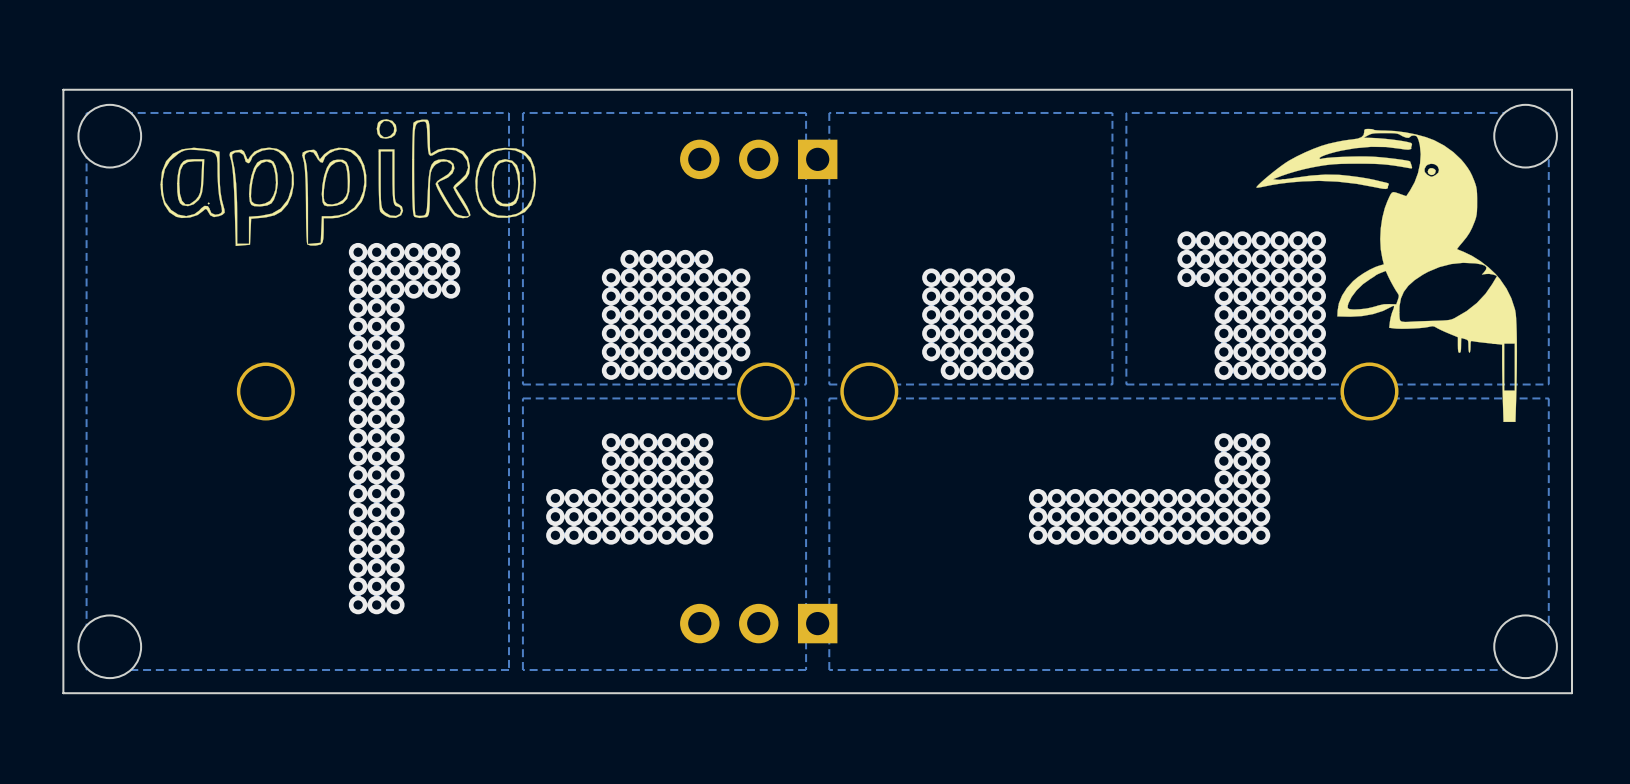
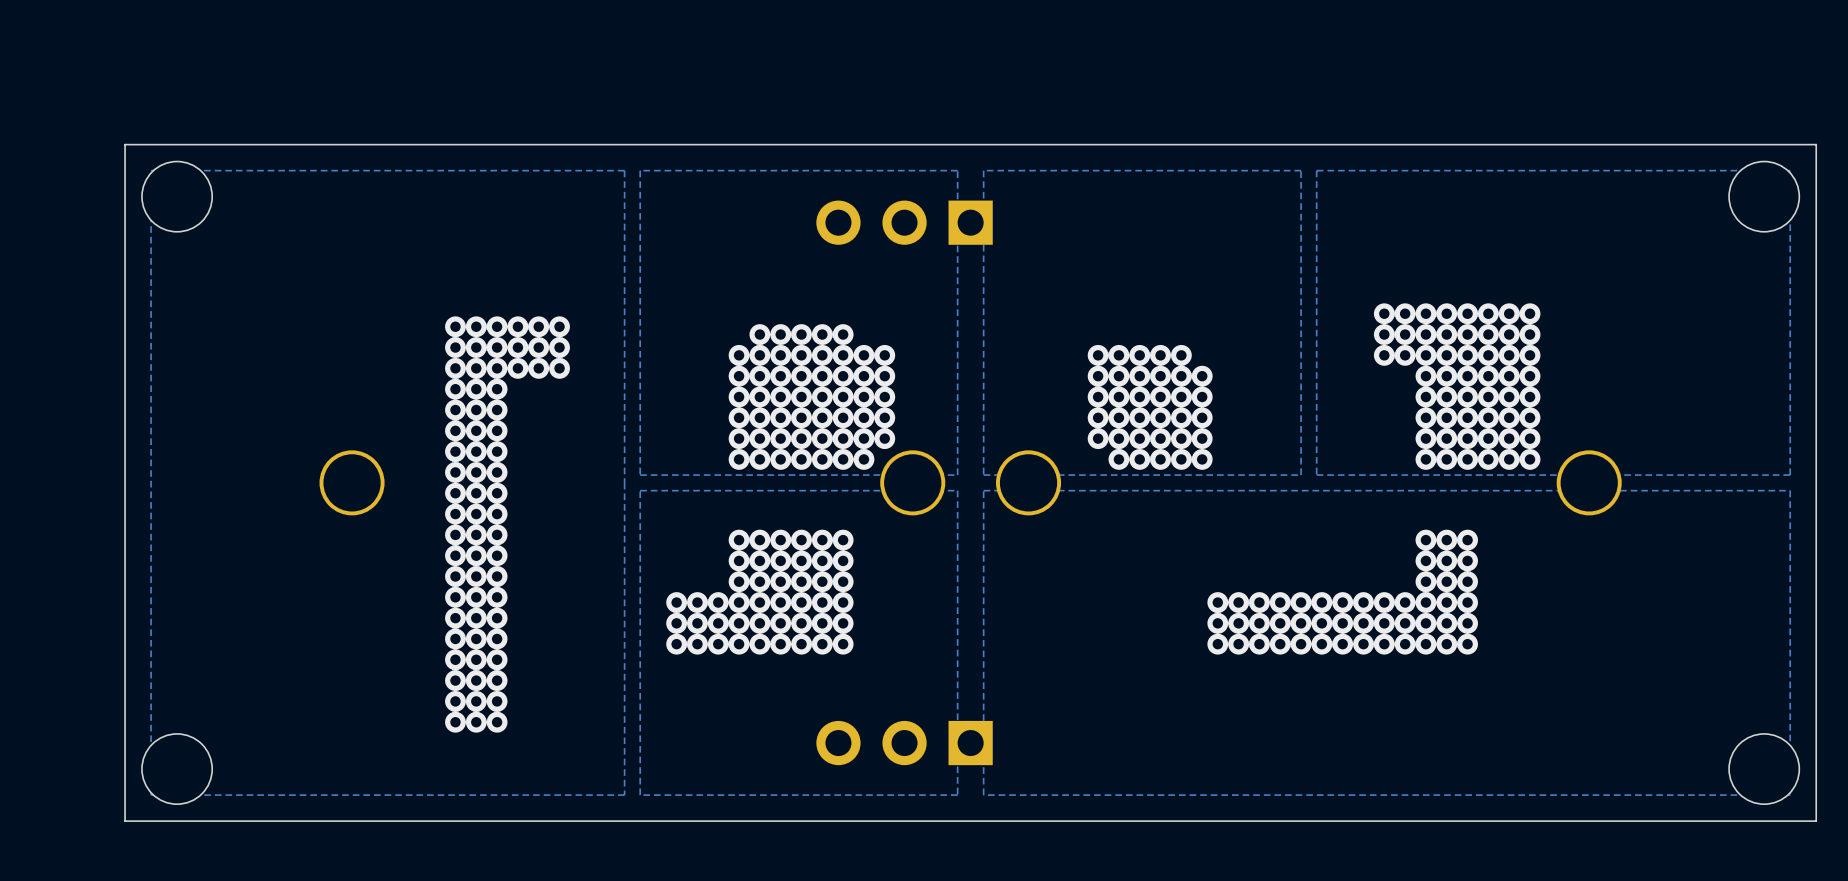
drawing: [160, 119, 536, 247] -> none
drawing: [1256, 128, 1518, 423] -> none

